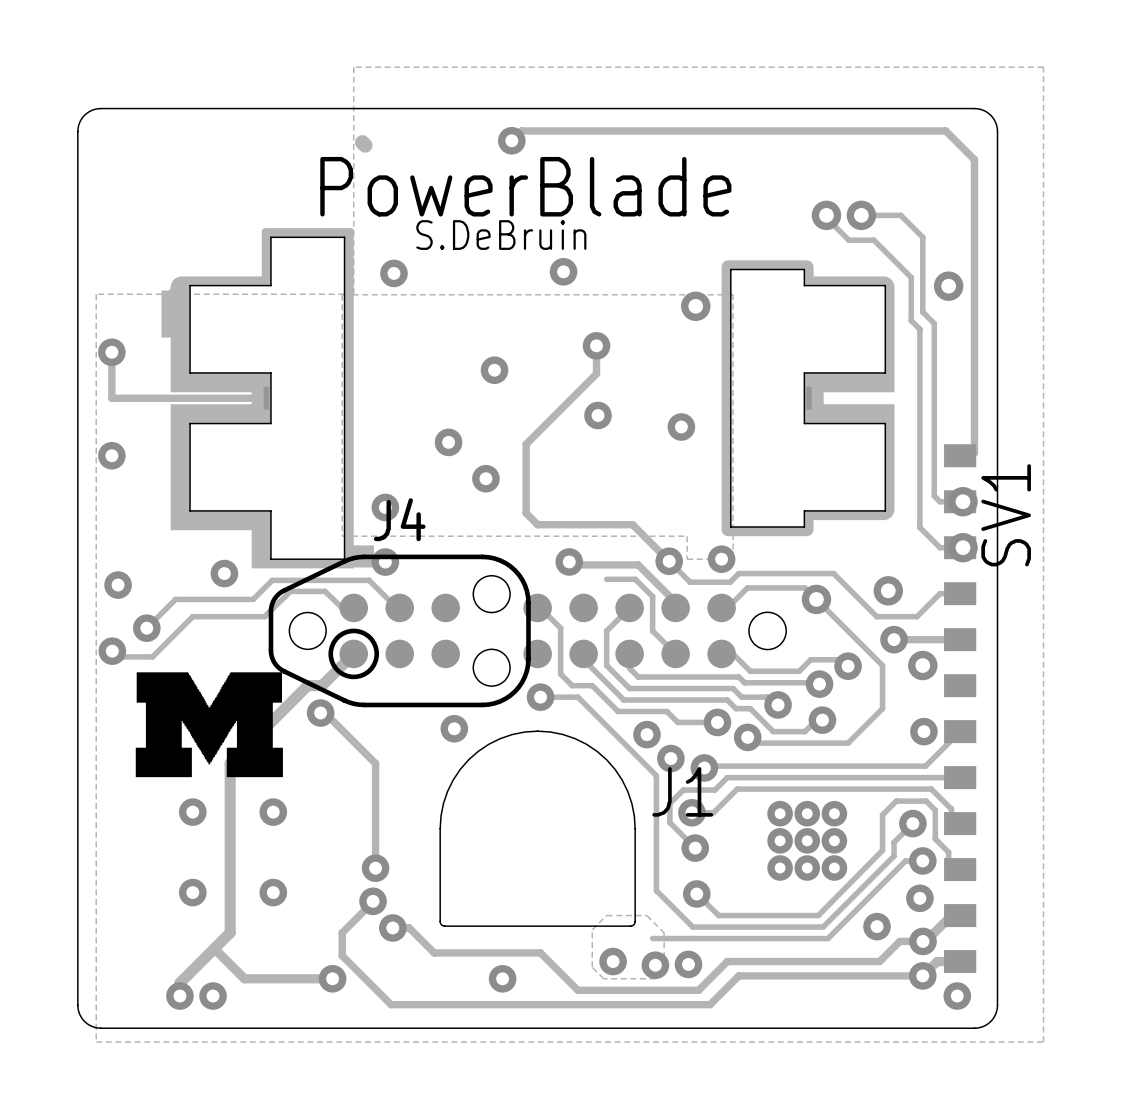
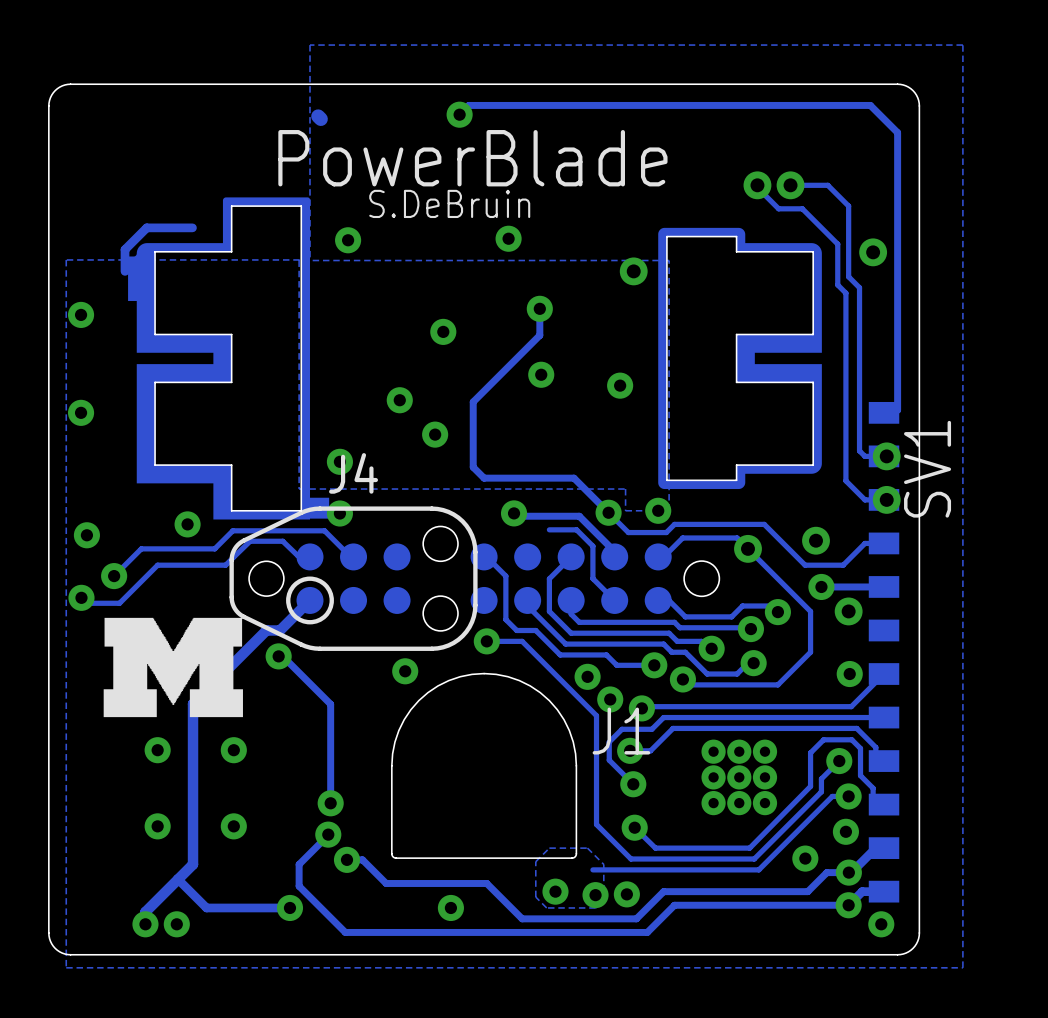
track: none -> (192, 227) (146, 227) (125, 249) (125, 271)
track: (111, 352) (111, 398) (266, 398) -> none

